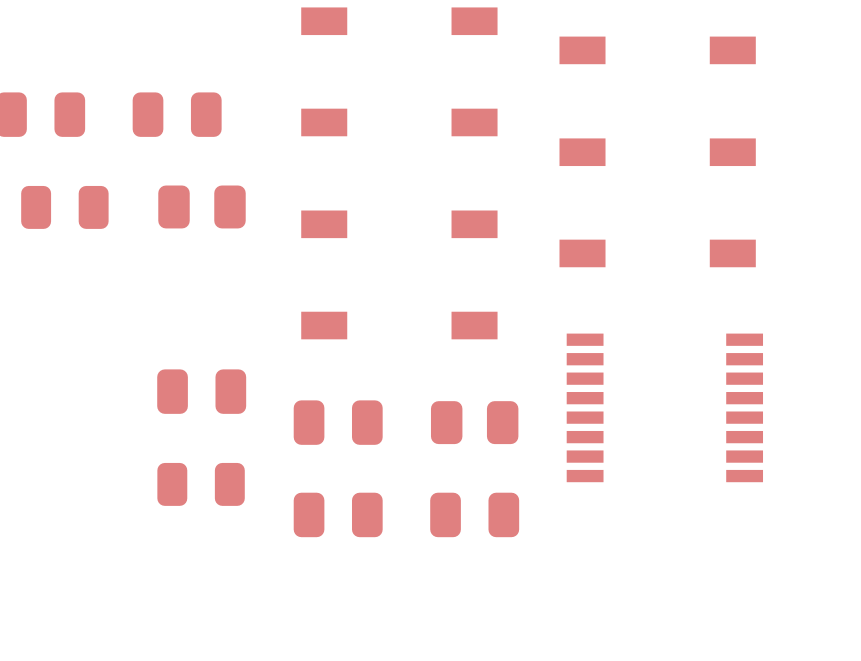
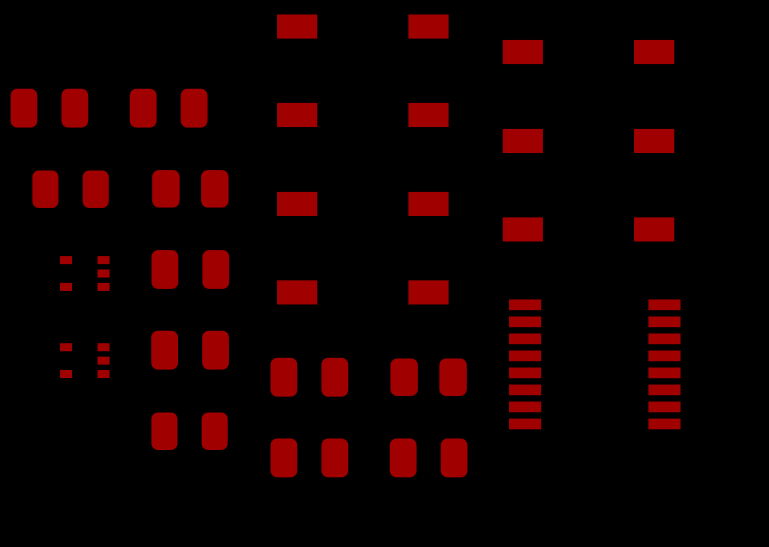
part: none -> (190, 269)
part: none -> (84, 273)
part: none -> (84, 360)

